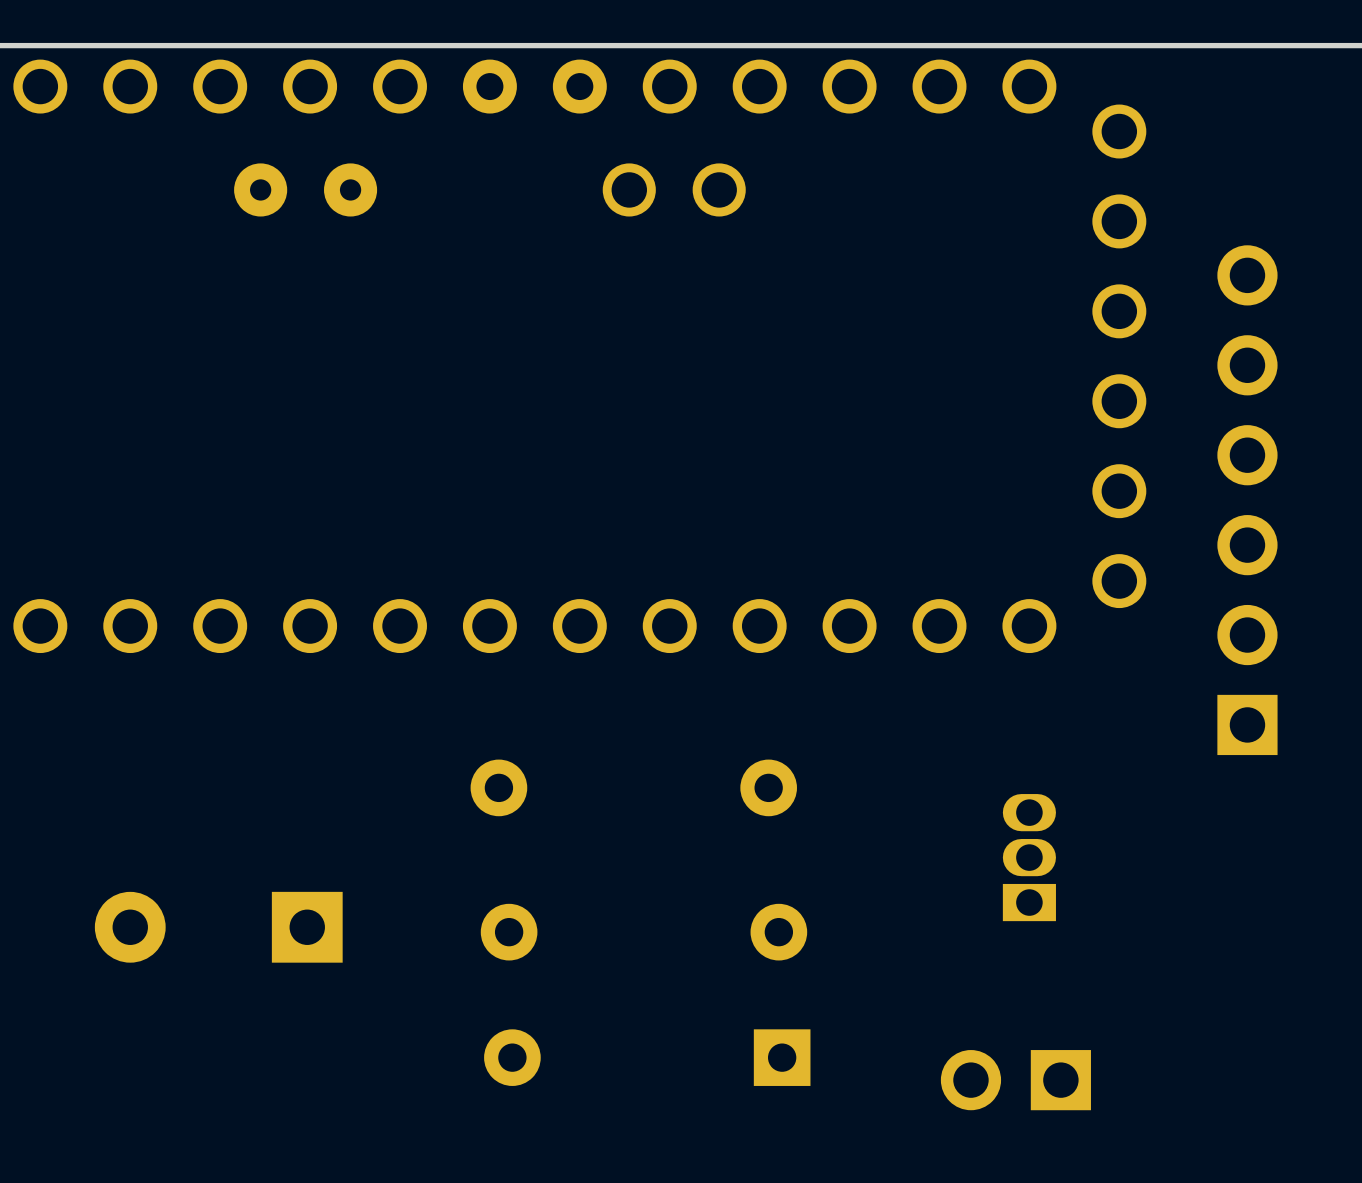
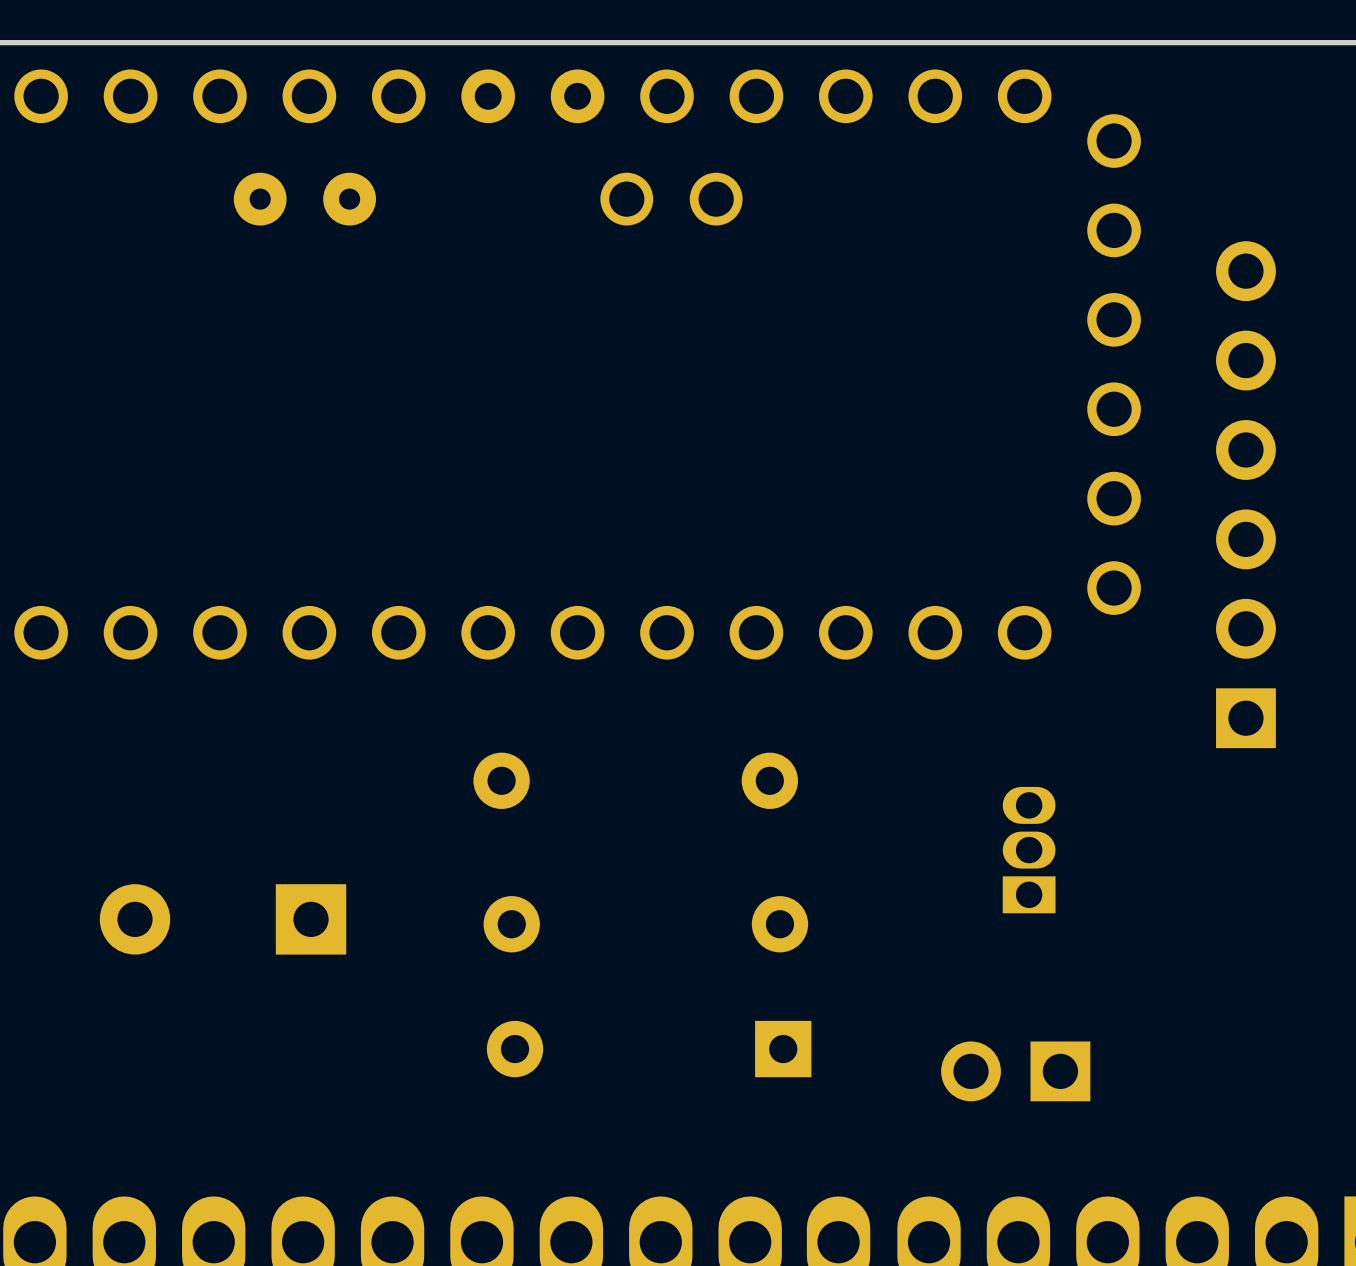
part position: (579, 356) -> (577, 364)

